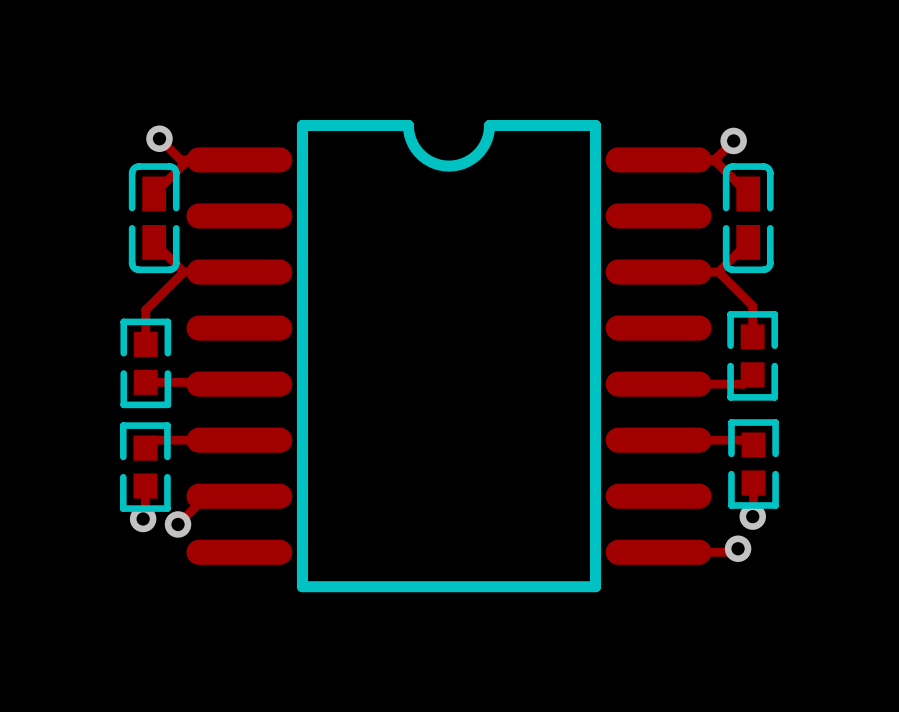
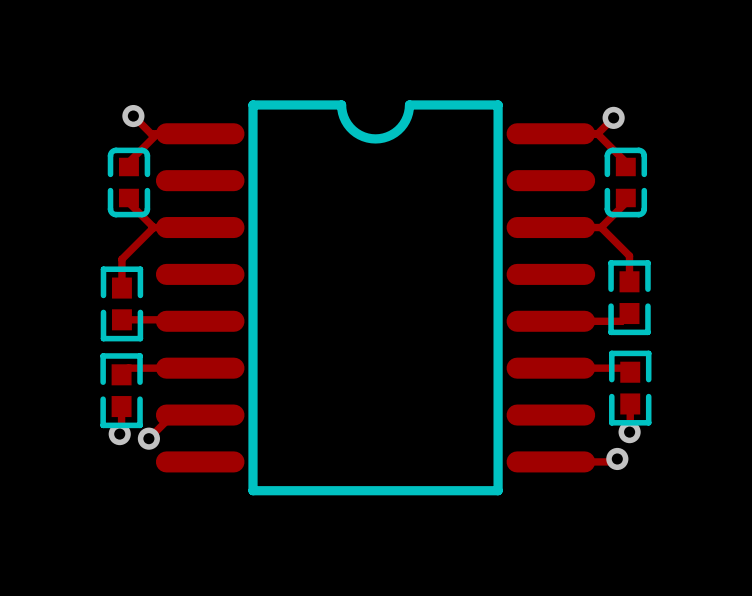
part footprint: [128, 163, 180, 274] -> [107, 147, 151, 218]
part footprint: [722, 163, 774, 274] -> [604, 147, 648, 218]

